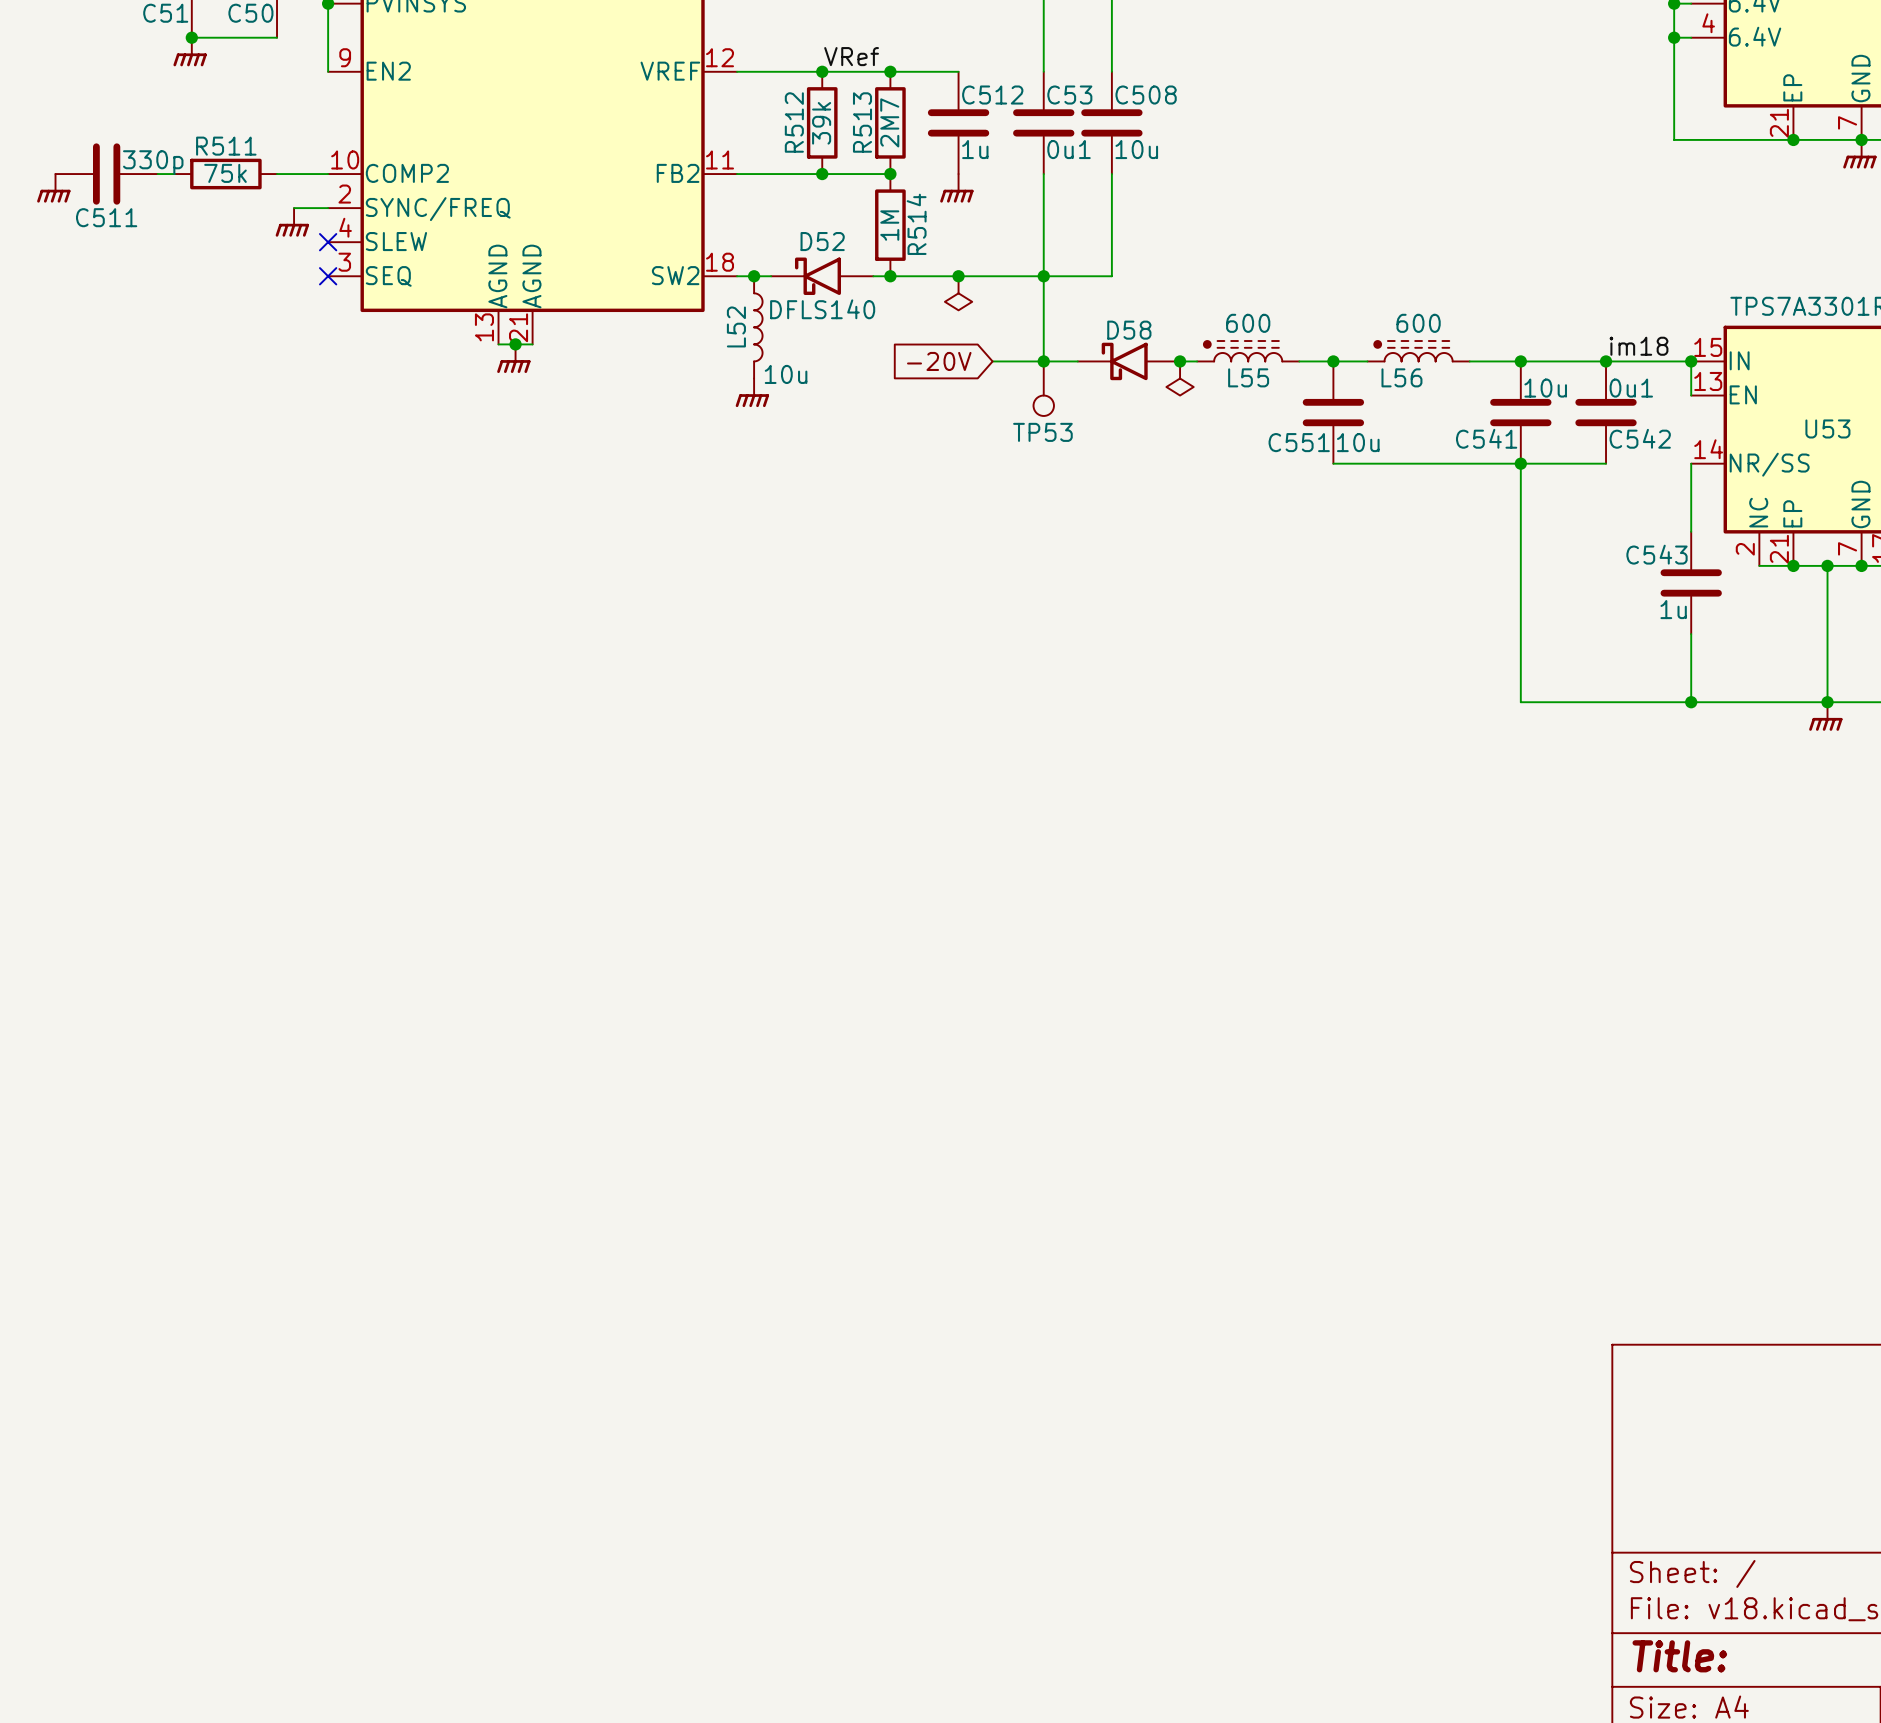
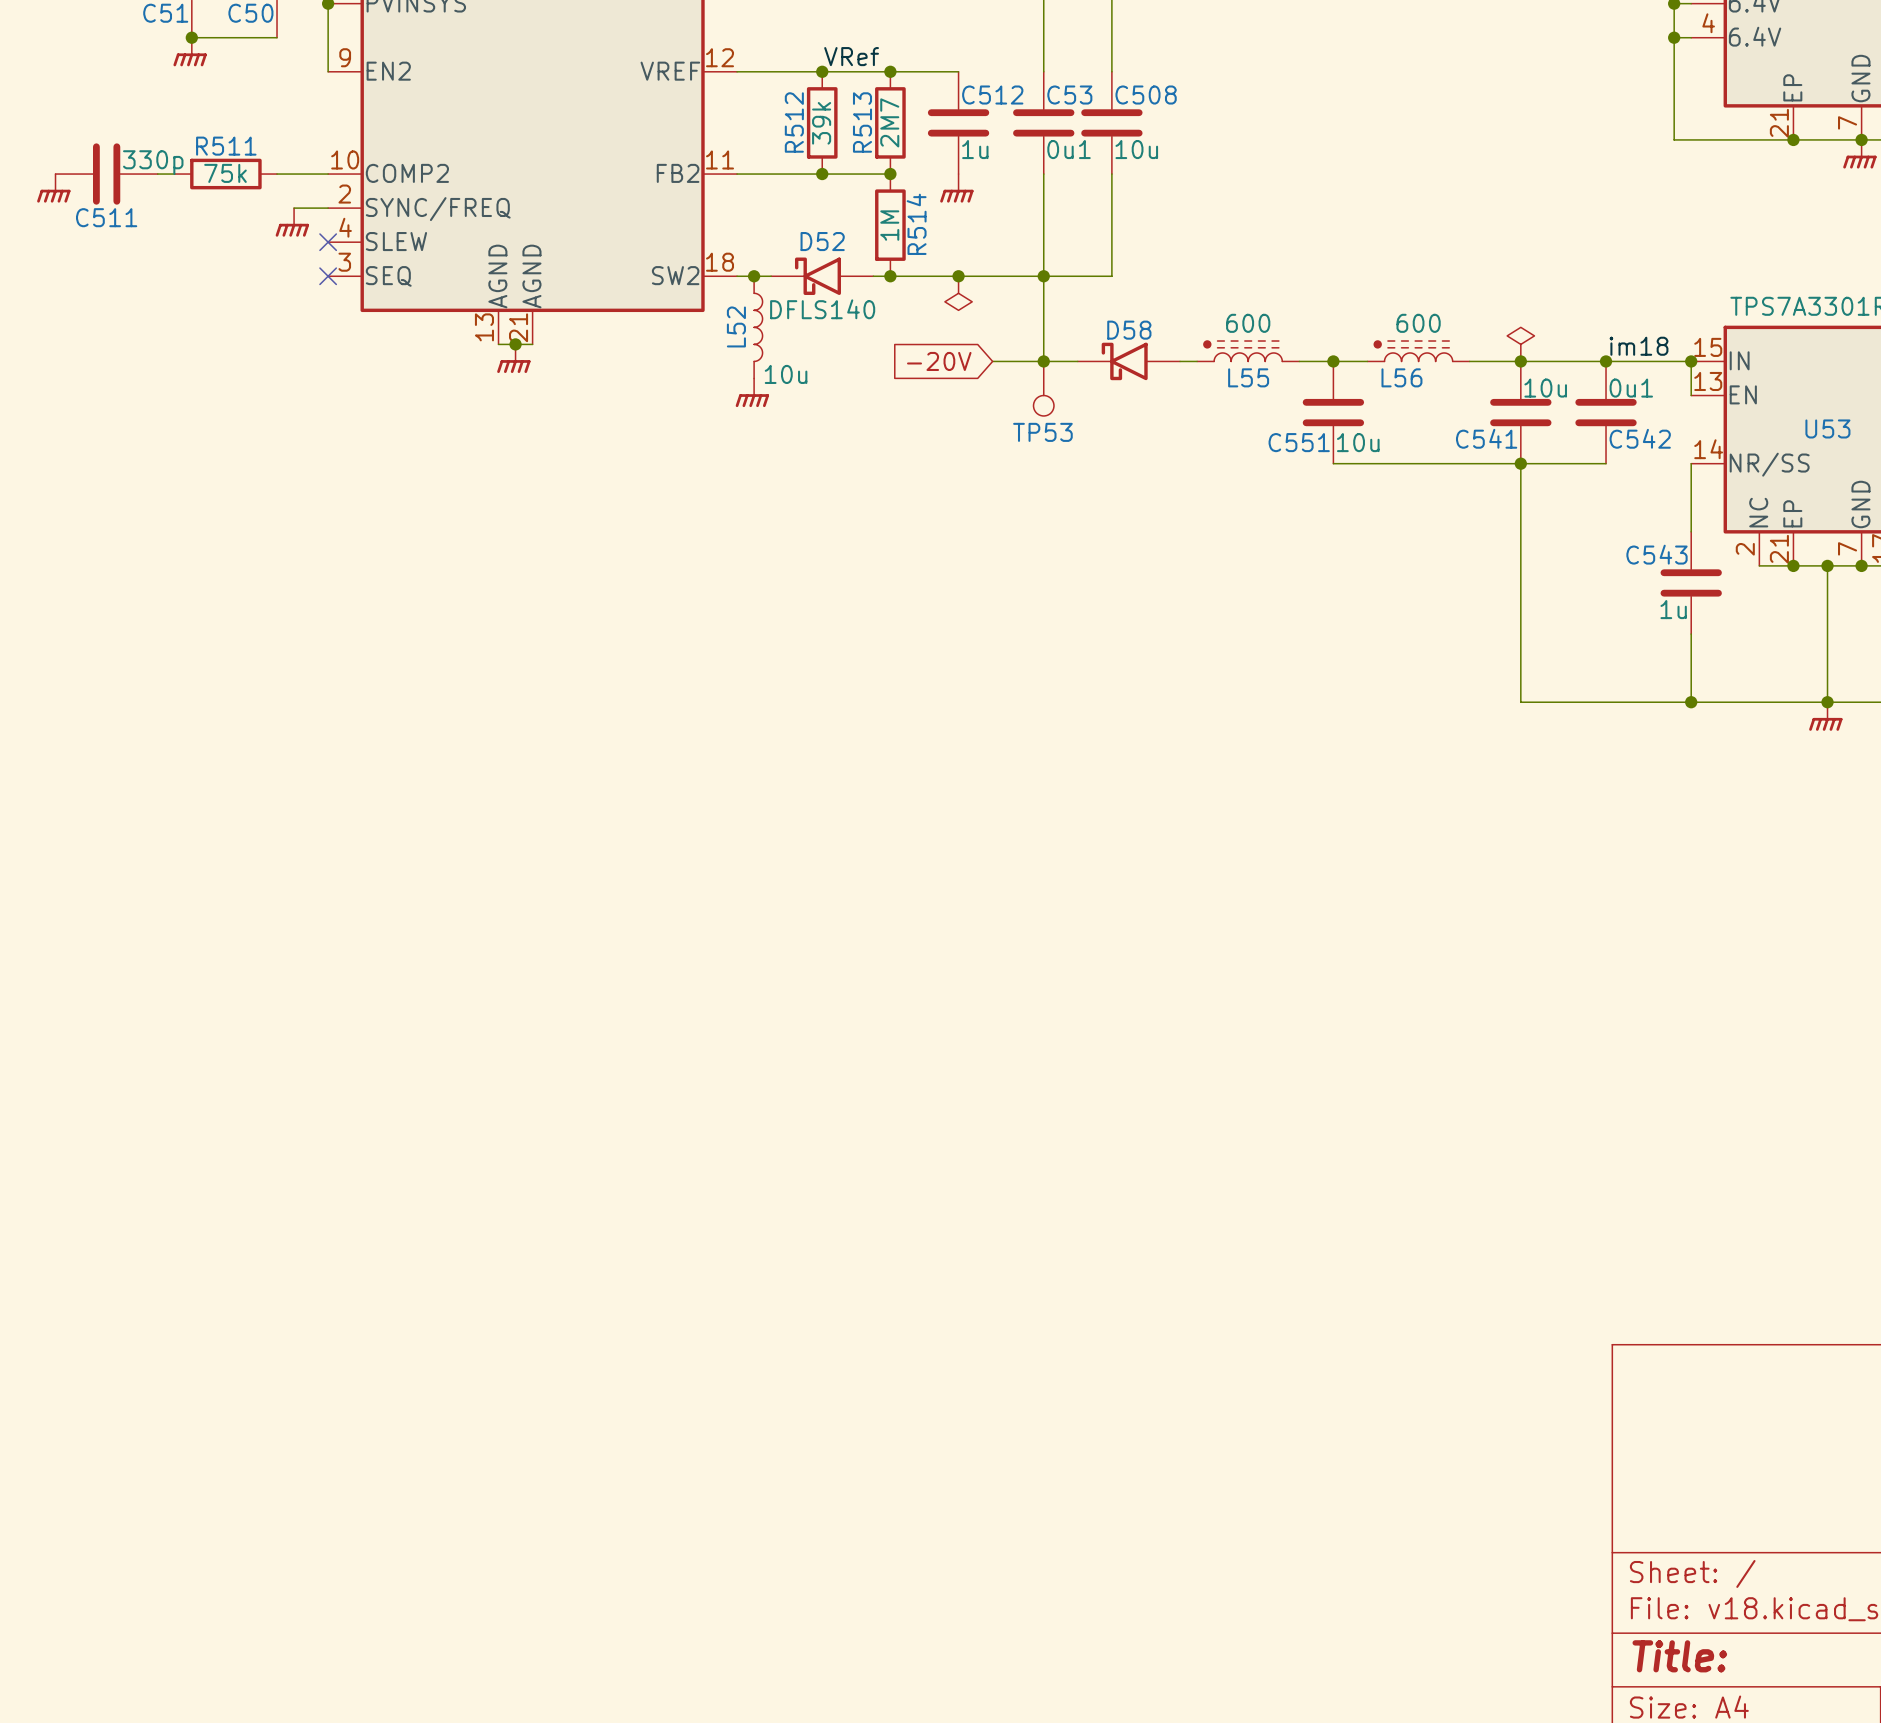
power symbol: none -> (1520, 344)
junction: (1180, 361) -> none
power symbol: (1180, 378) -> none

